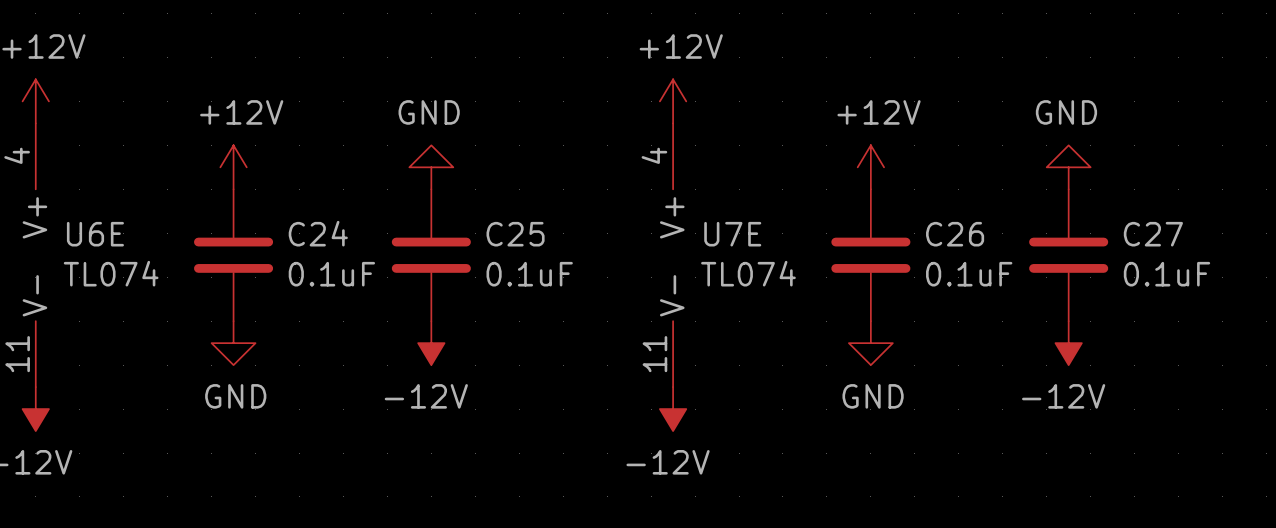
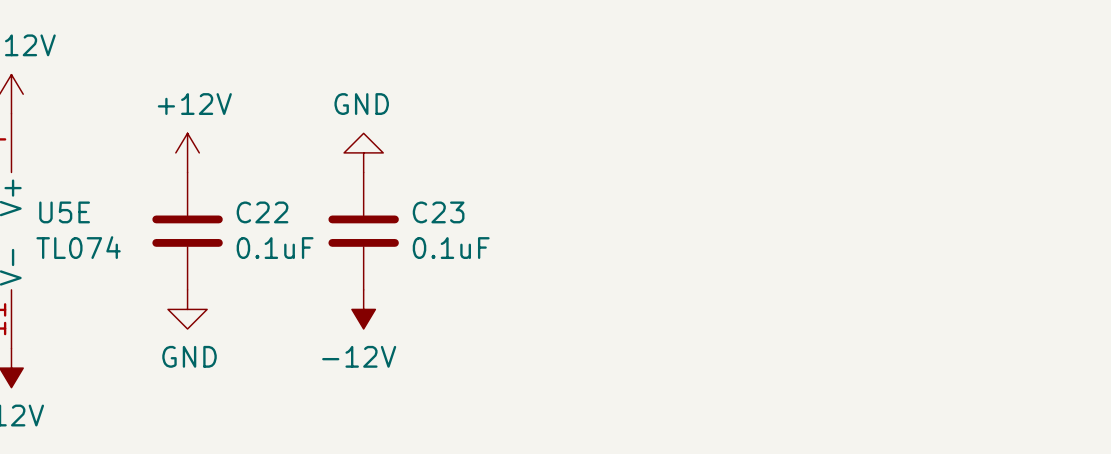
power symbol: +12V (673, 101) -> none
power symbol: +12V (870, 167) -> none
power symbol: GND (1068, 167) -> none
C24 name: C24 (318, 233) -> C22 (262, 212)
U6E name: U6E (95, 234) -> U5E (64, 212)
C25 name: C25 (515, 234) -> C23 (438, 212)
U7E: TL074 (673, 255) -> none
C26: 0.1uF (870, 255) -> none
C27: 0.1uF (1068, 255) -> none
power symbol: GND (870, 343) -> none
power symbol: -12V (1068, 343) -> none
power symbol: -12V (673, 409) -> none

